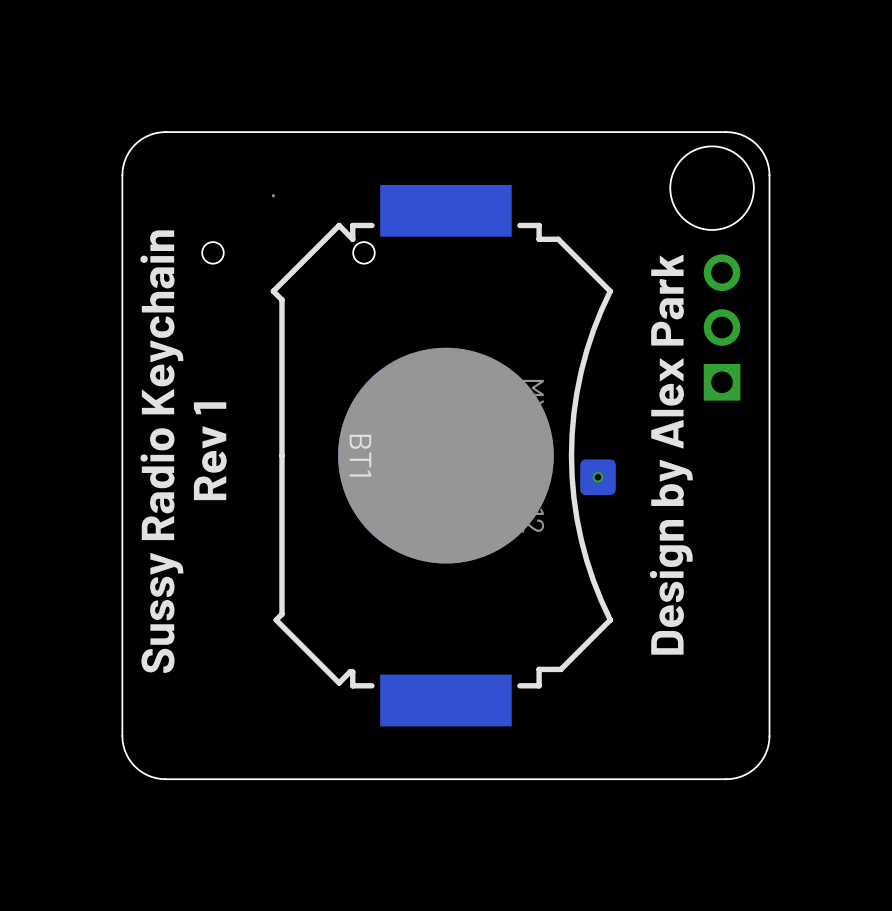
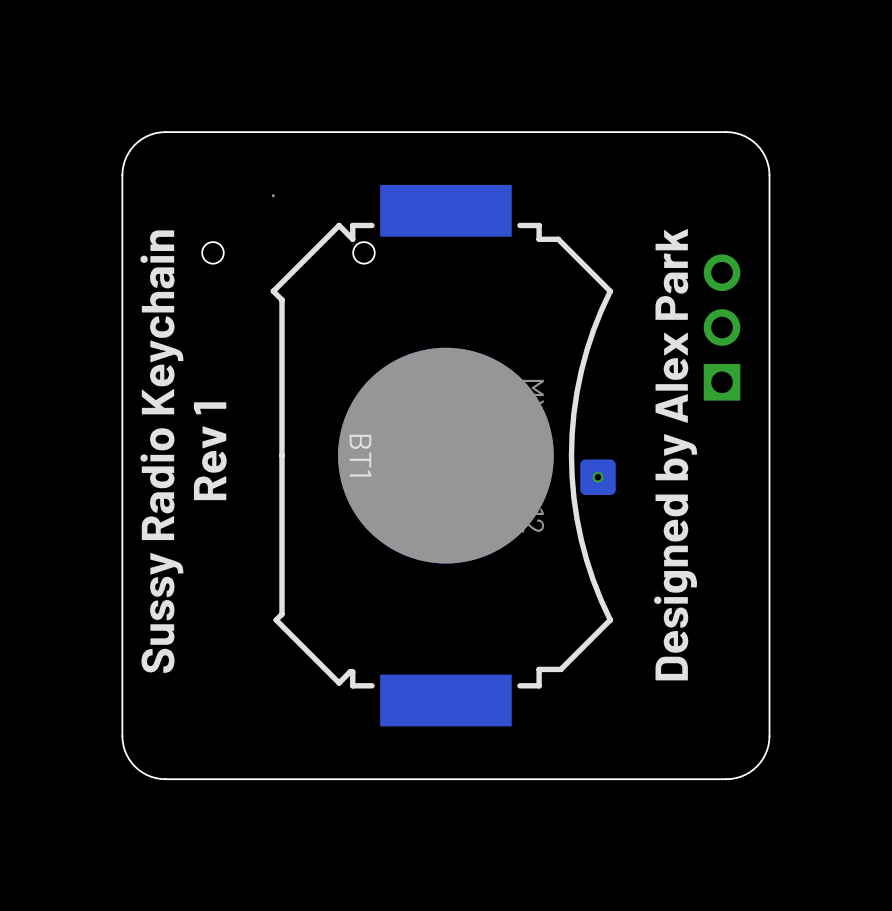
round board edge: [669, 145, 755, 231] -> none
text: Design by Alex Park (671, 454) -> Designed by Alex Park (675, 454)

